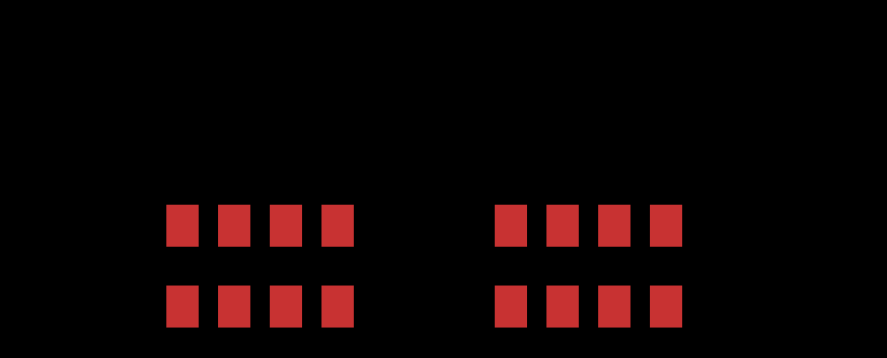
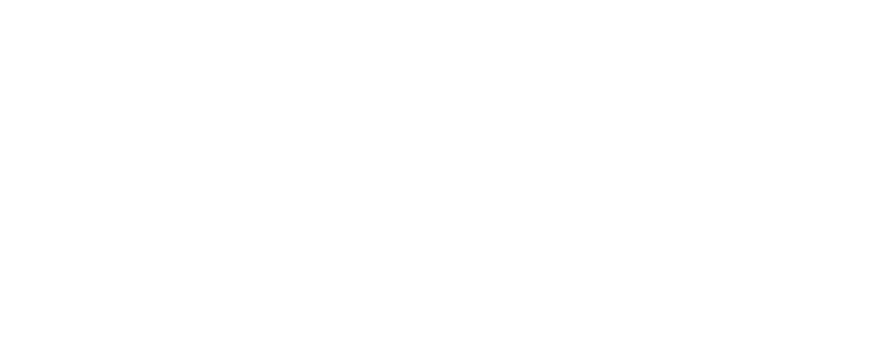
part: (260, 266) -> none
part: (588, 266) -> none

